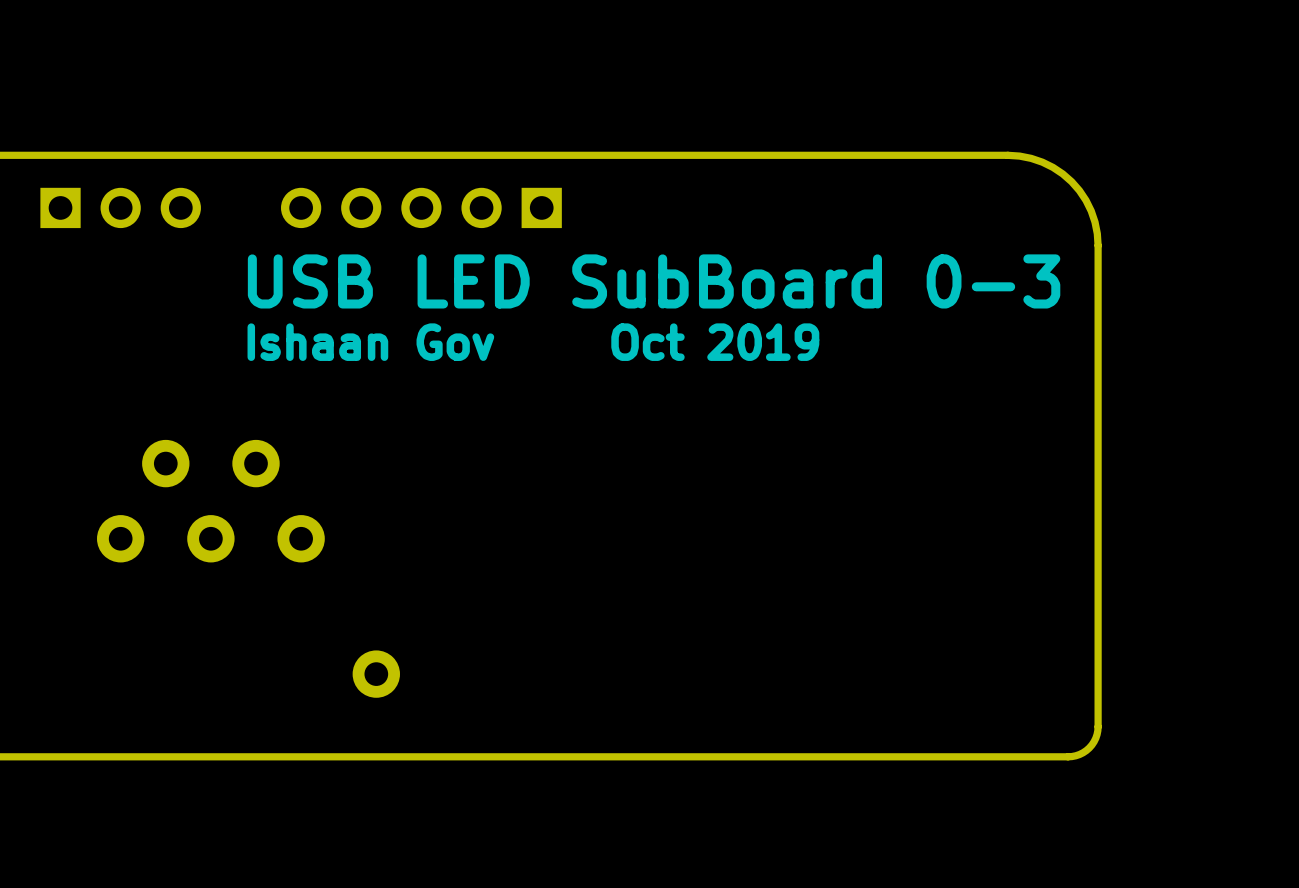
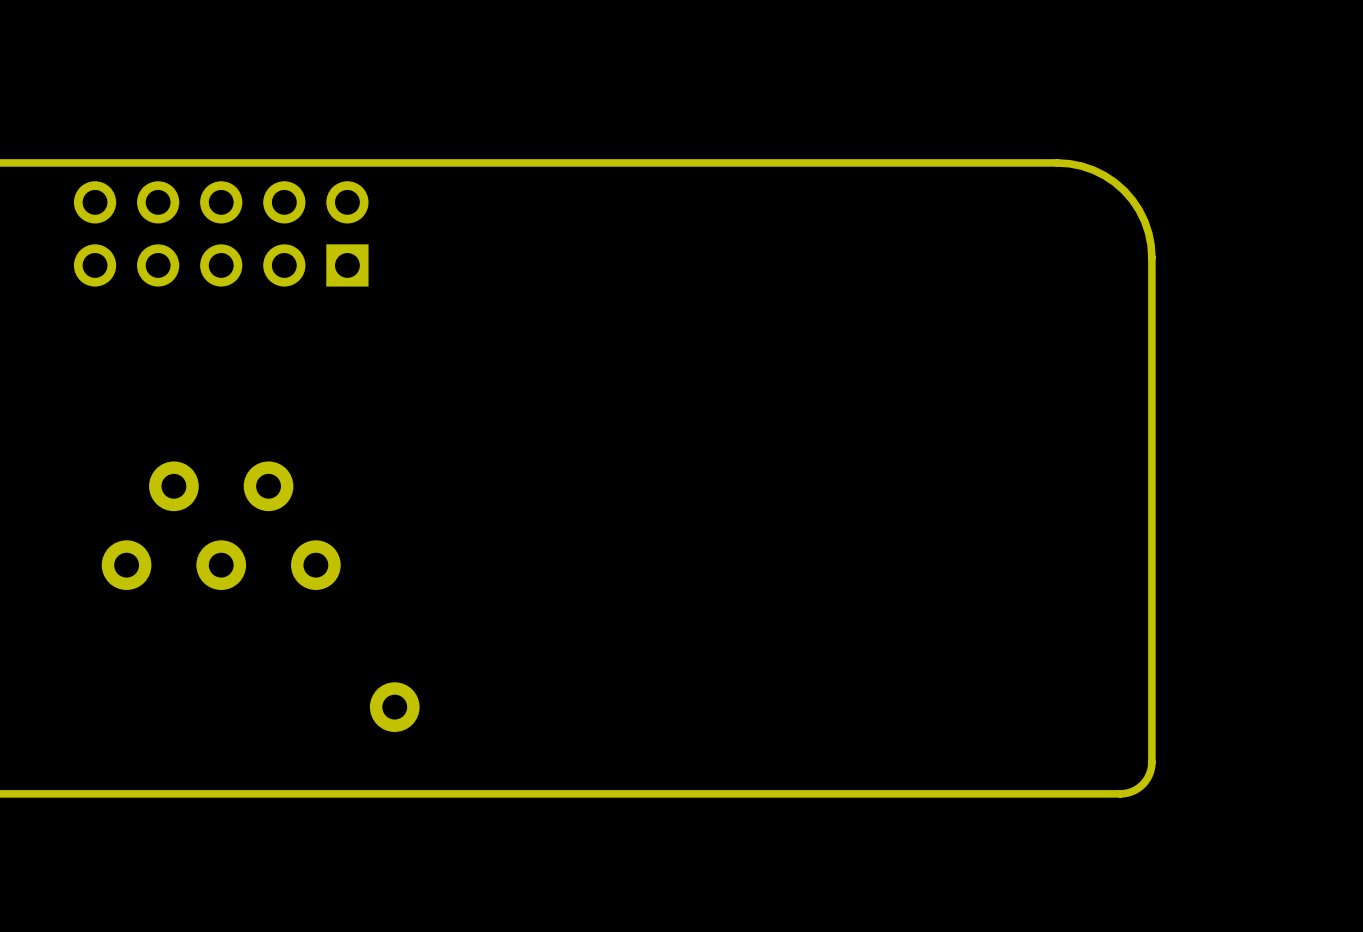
part: (120, 207) -> none
part: (421, 207) -> none
part: none -> (221, 233)
text: USB LED SubBoard 0-3 (654, 281) -> none
text: Ishaan Gov Oct 2019 (533, 342) -> none

